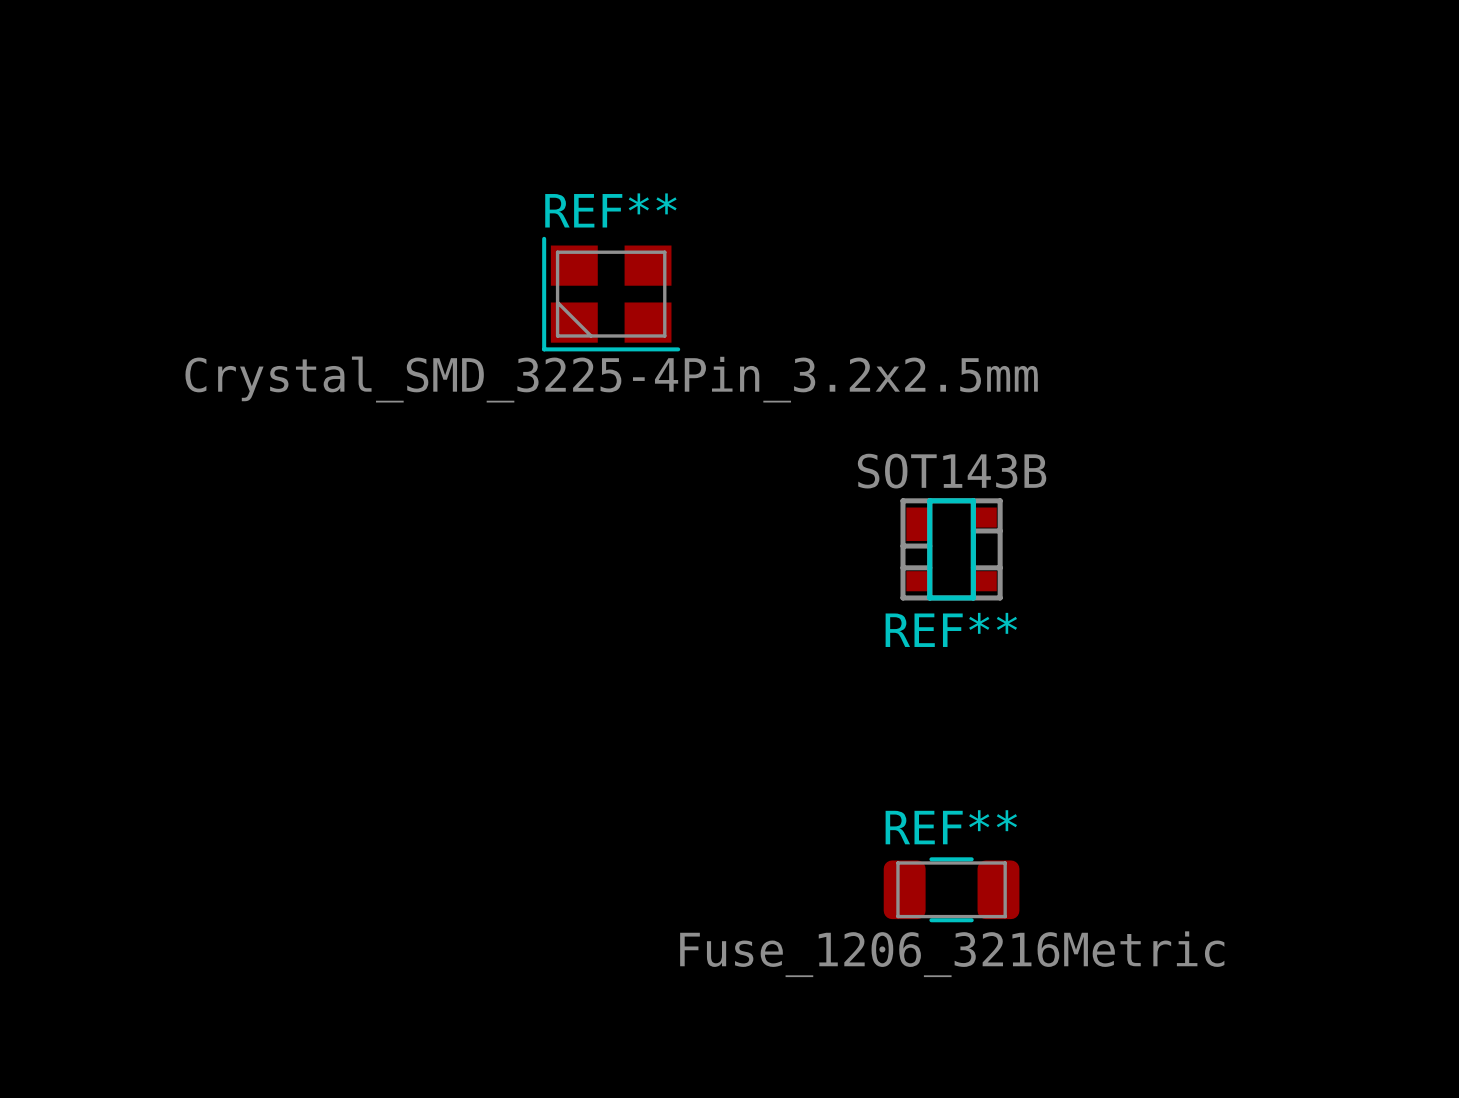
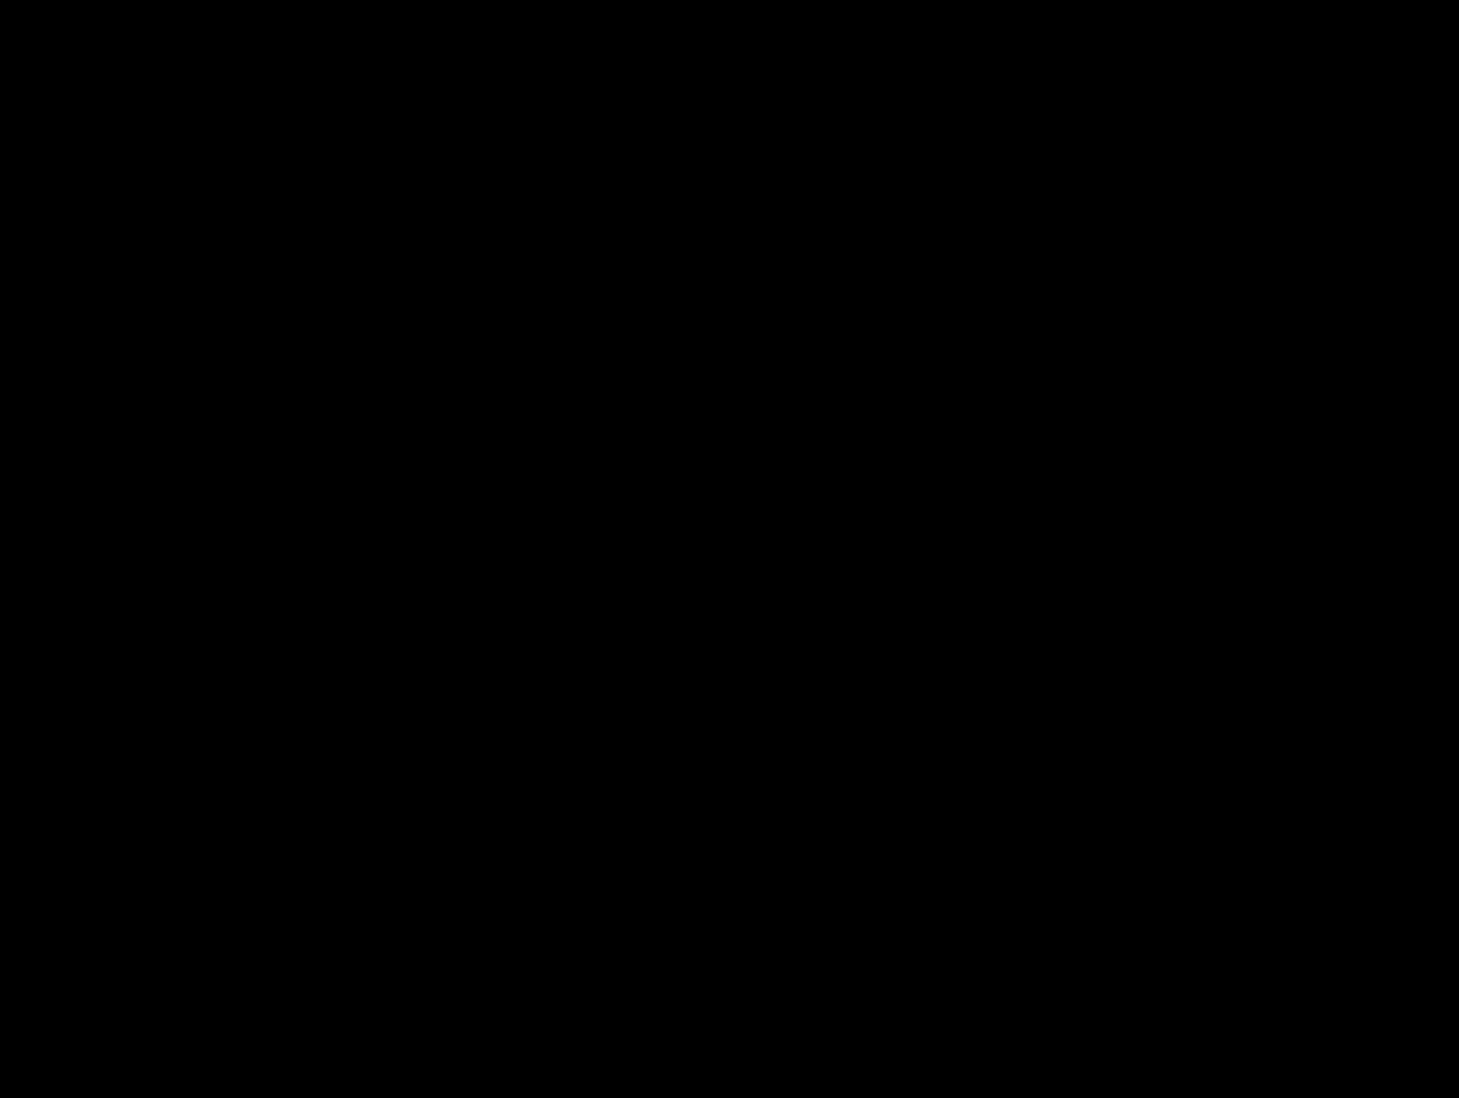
REF**: Crystal_SMD_3225-4Pin_3.2x2.5mm (611, 294) -> none
REF**: SOT143B (951, 549) -> none
REF**: Fuse_1206_3216Metric (951, 889) -> none

